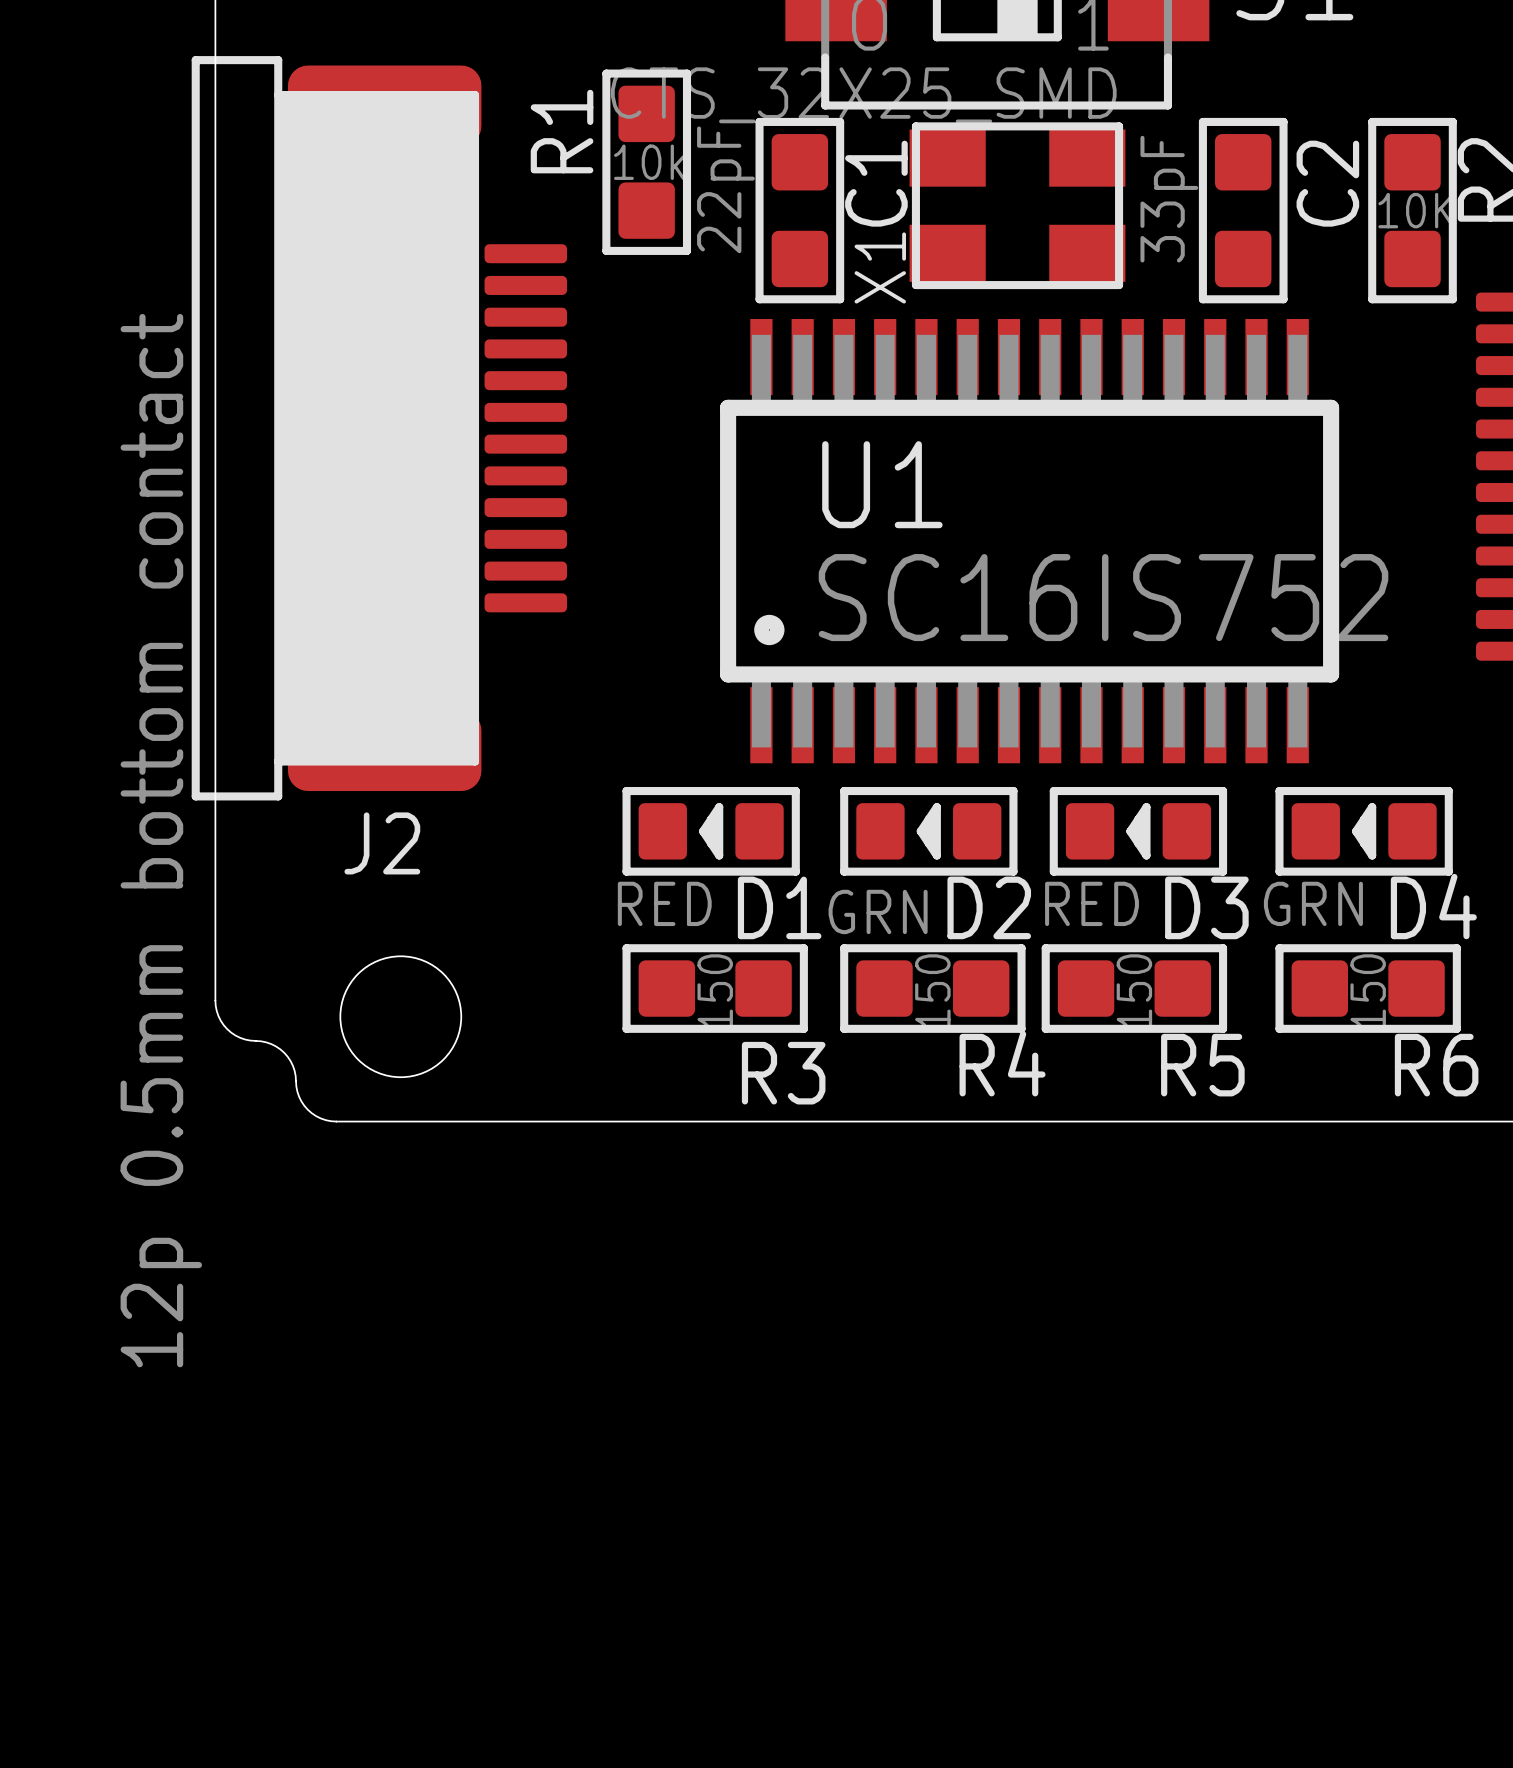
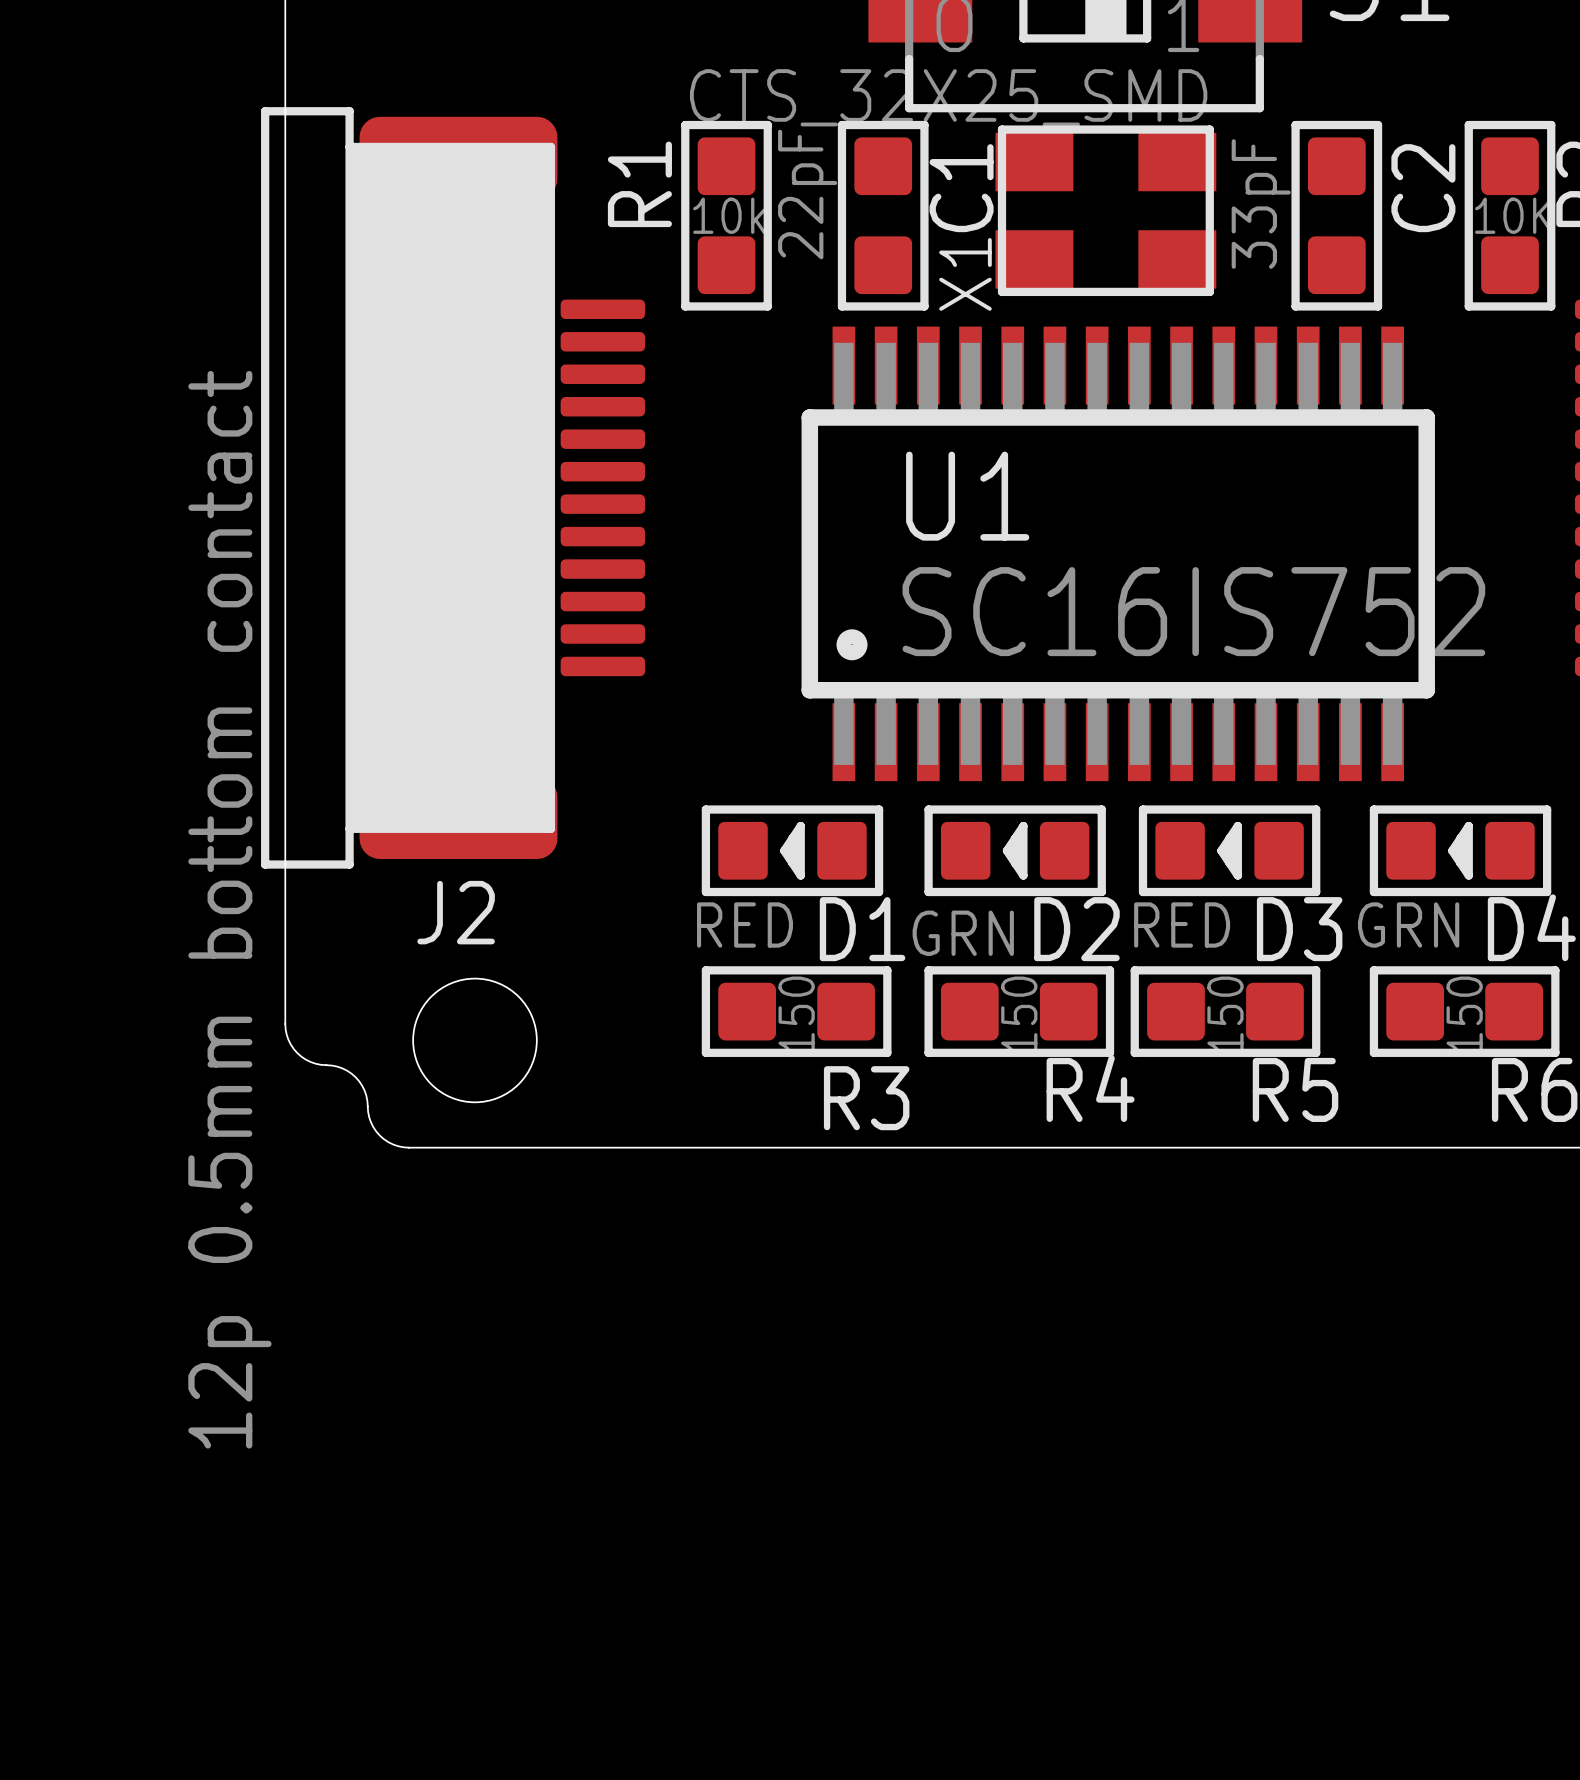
R1 position: (646, 162) -> (726, 215)
J2 position: (379, 428) -> (453, 487)

